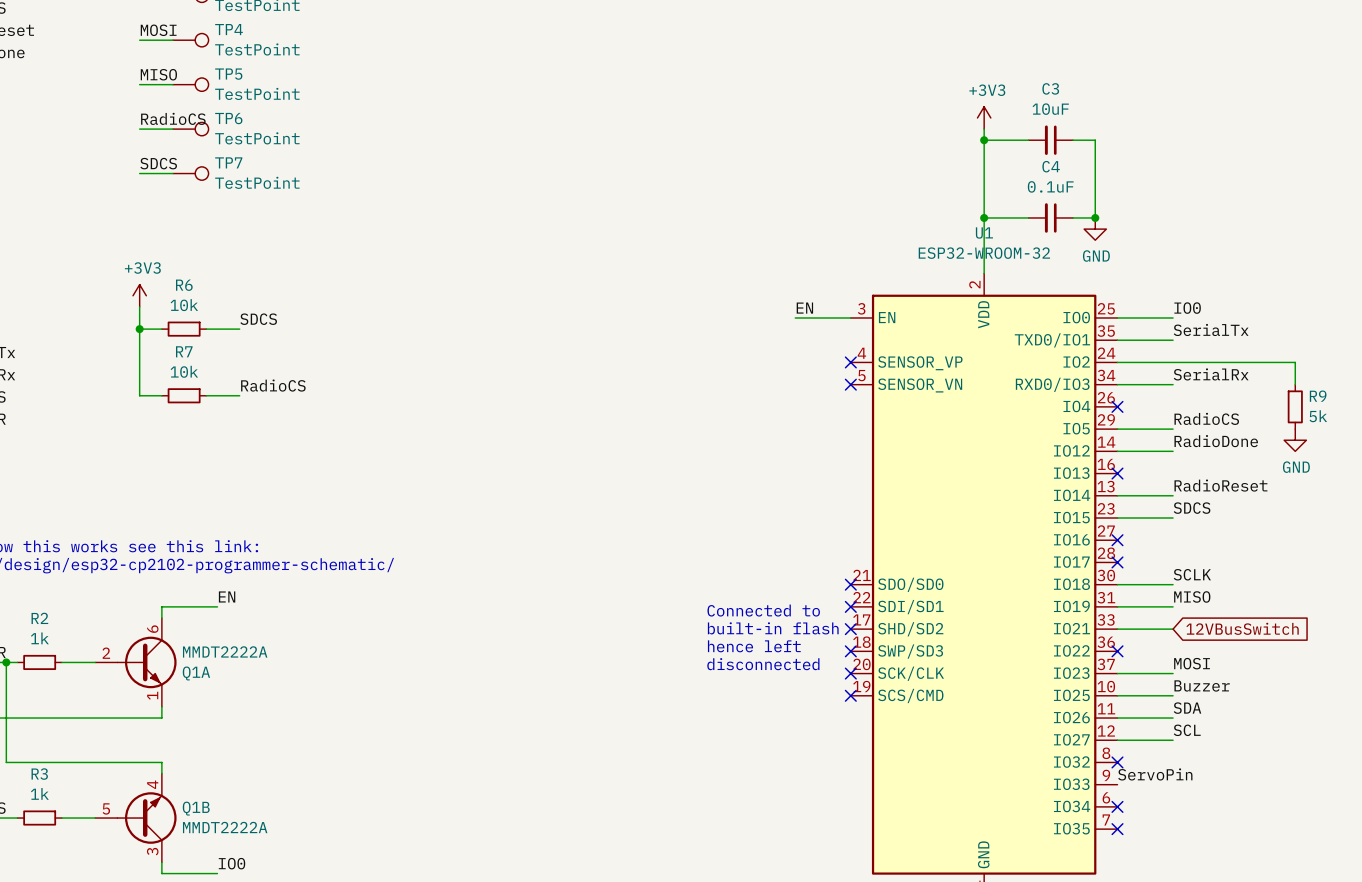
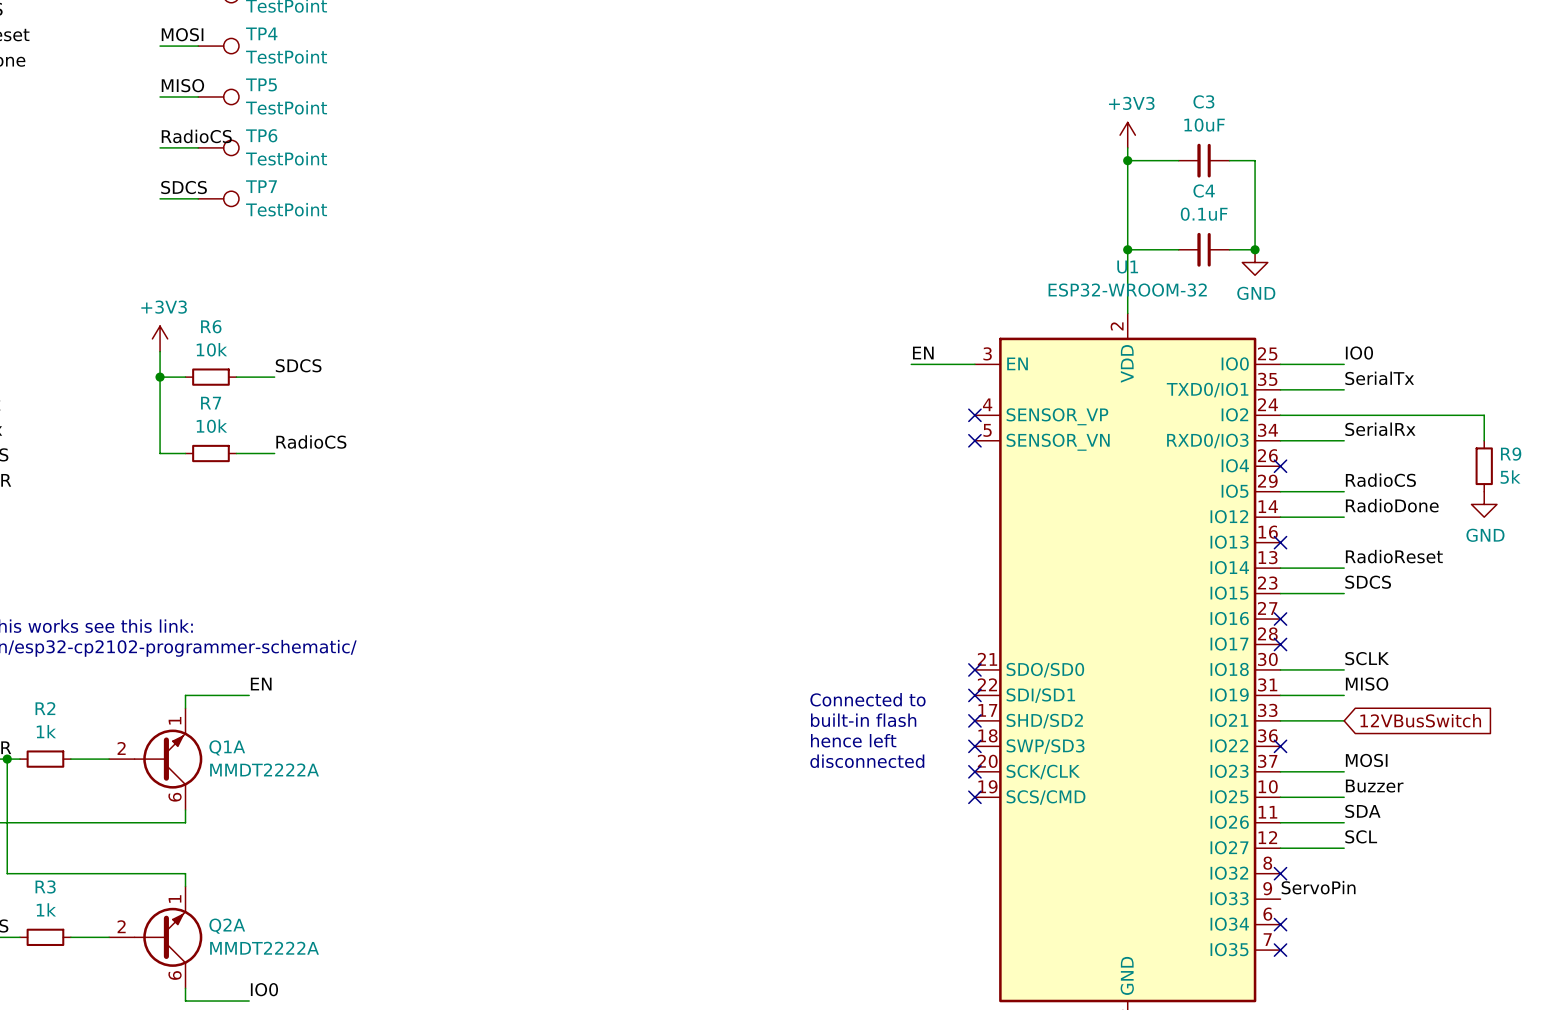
Q1A flip: as is (147, 662) -> up-down (168, 759)
Q1B pin number: 4 (152, 784) -> 1 (175, 898)
Q1B pin number: 5 (106, 808) -> 2 (121, 926)
Q1B name: Q1B (196, 808) -> Q2A (227, 926)
Q1B pin number: 3 (152, 851) -> 6 (175, 975)

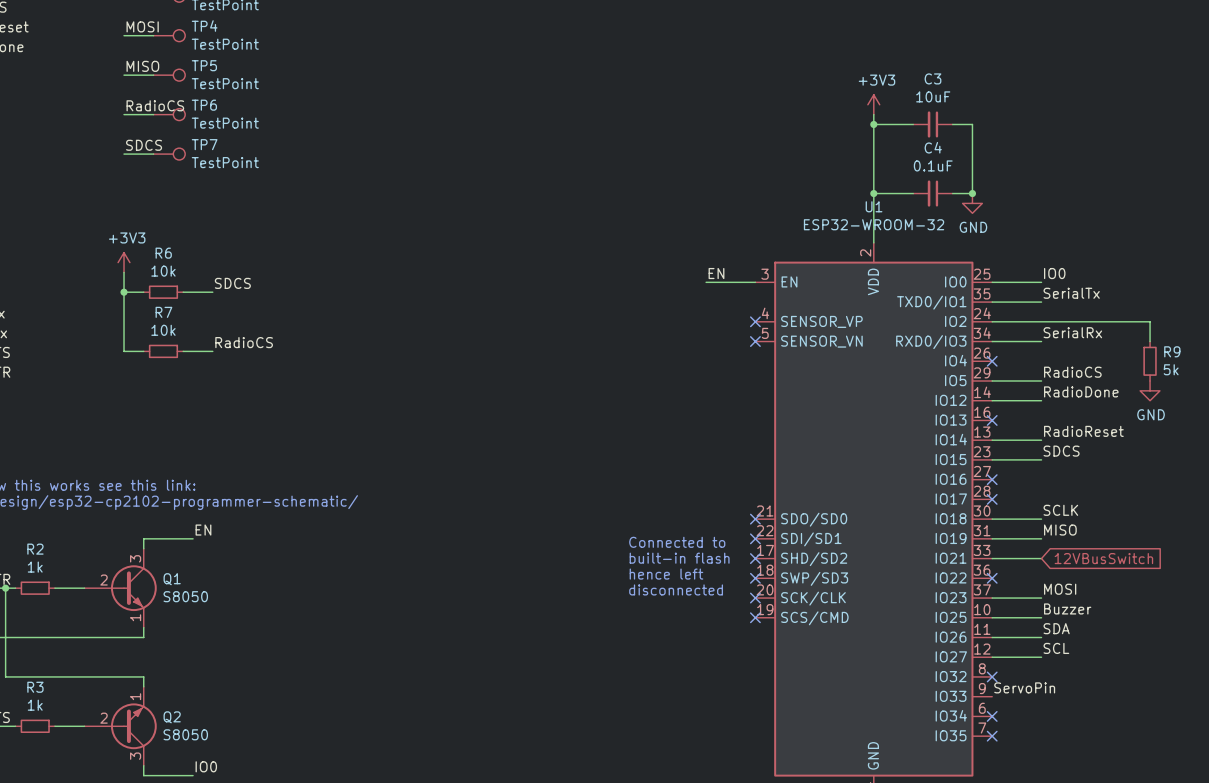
Q1A: MMDT2222A (155, 759) -> none
Q1: none -> S8050 (120, 588)
Q2A: MMDT2222A (155, 937) -> none
Q2: none -> S8050 (120, 726)

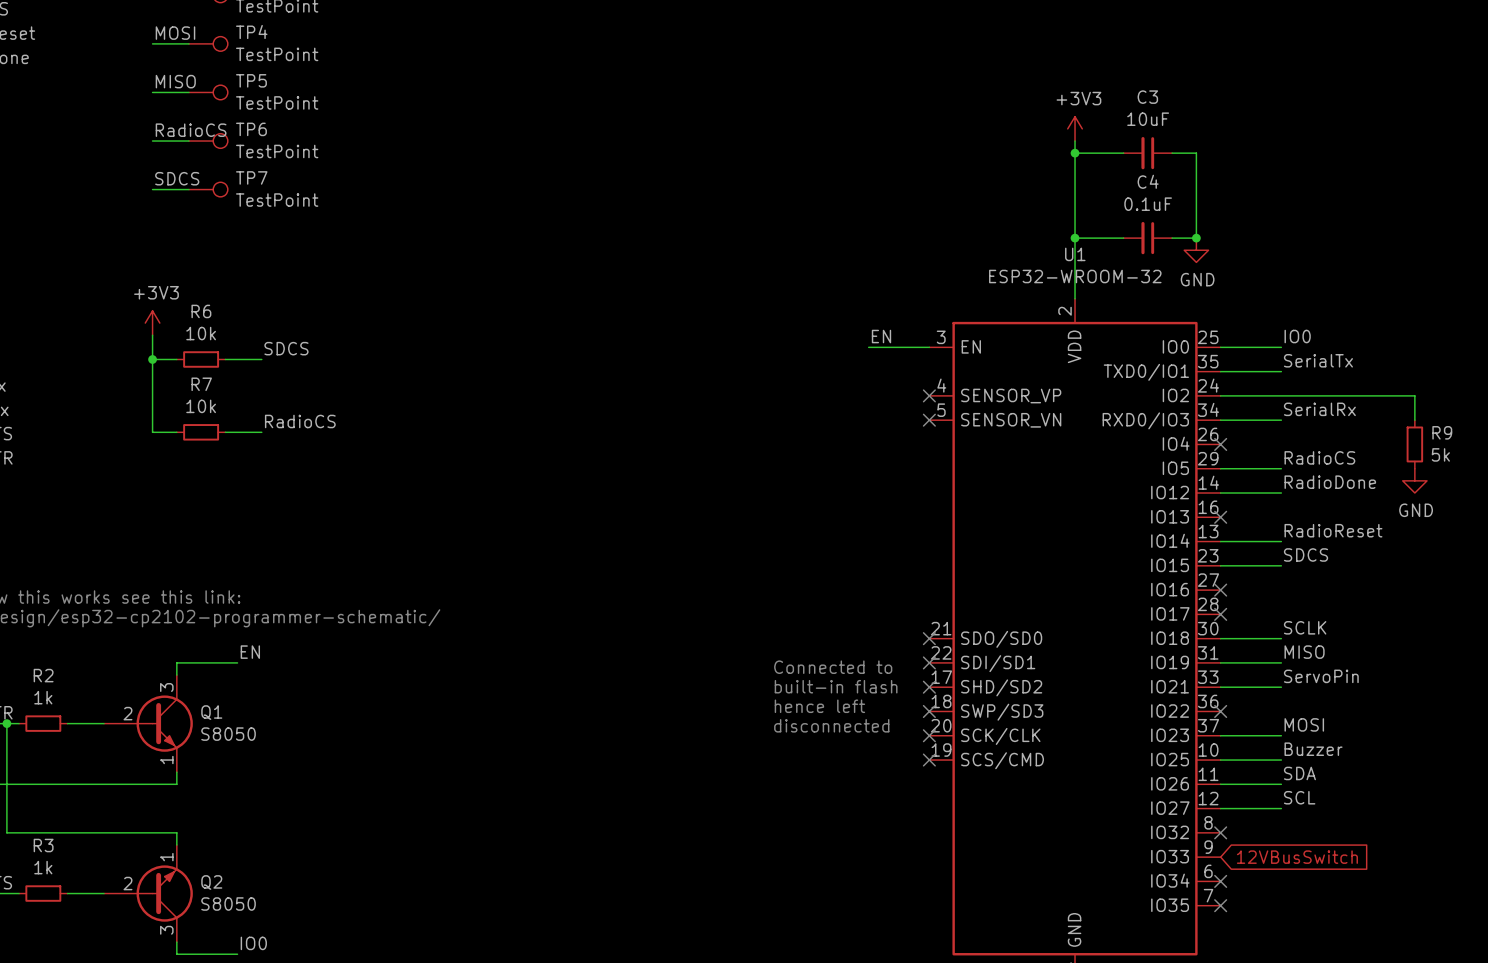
global label position: 12VBusSwitch (1103, 558) -> 12VBusSwitch (1297, 857)
label position: ServoPin (1024, 687) -> ServoPin (1321, 676)

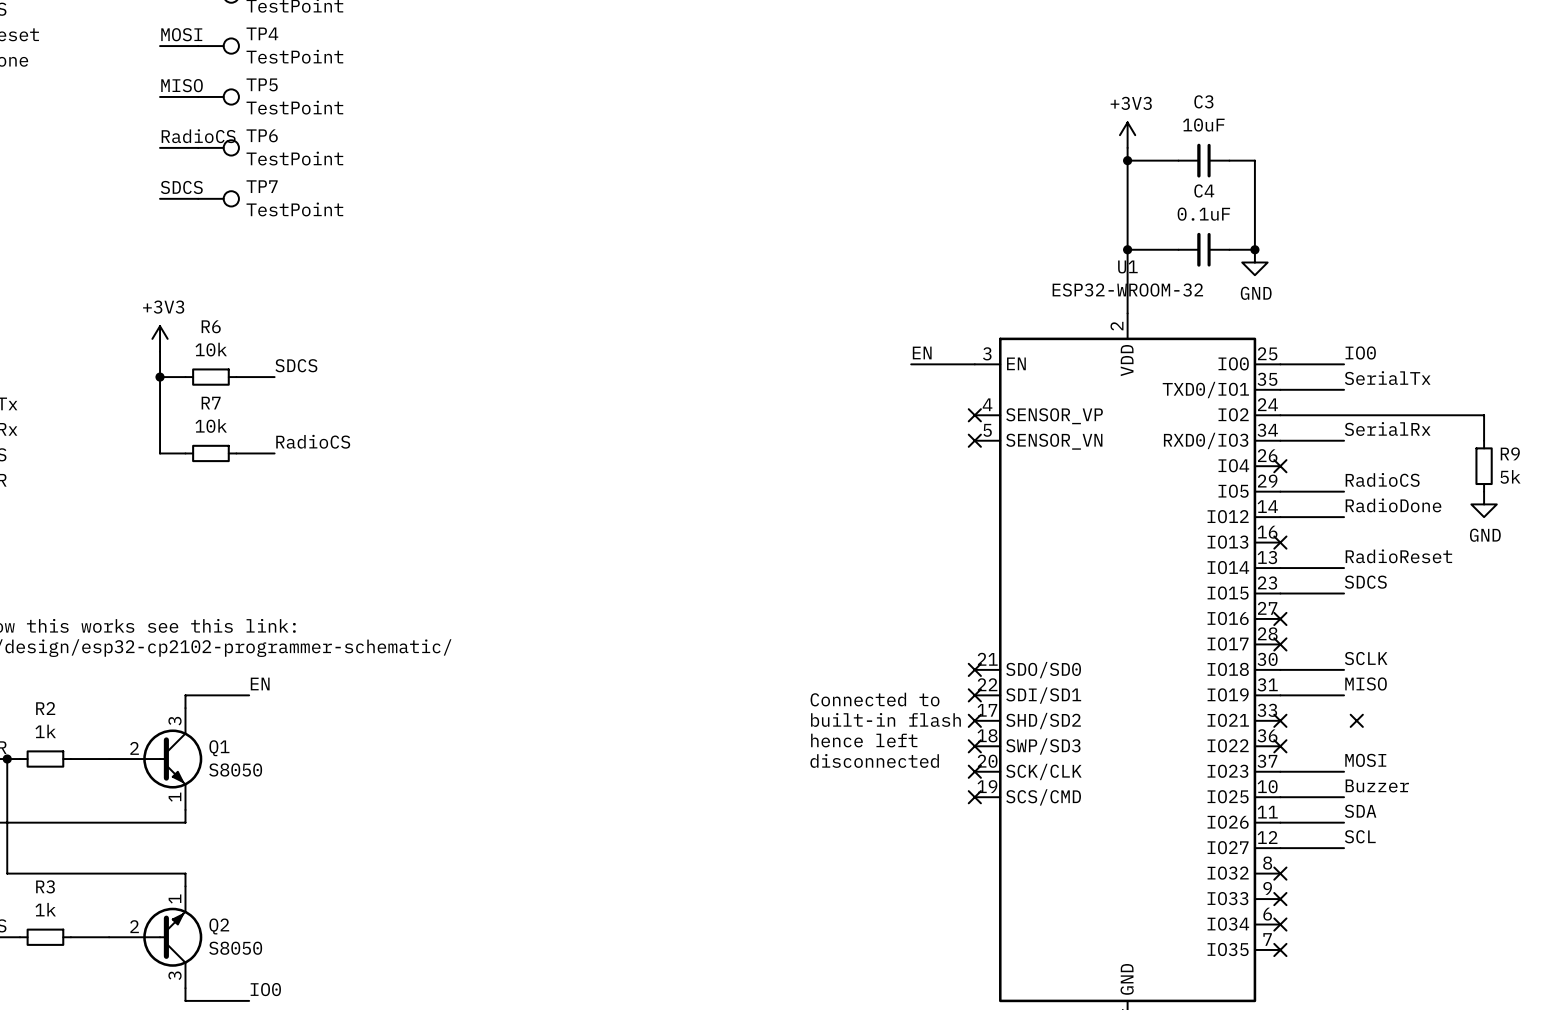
label: ServoPin (1321, 676) -> none
wire: (1220, 687) (1281, 687) -> none
no-connect mark: none -> (1280, 720)
no-connect mark: none -> (1356, 720)
no-connect mark: none -> (1280, 899)
global label: 12VBusSwitch (1297, 857) -> none

